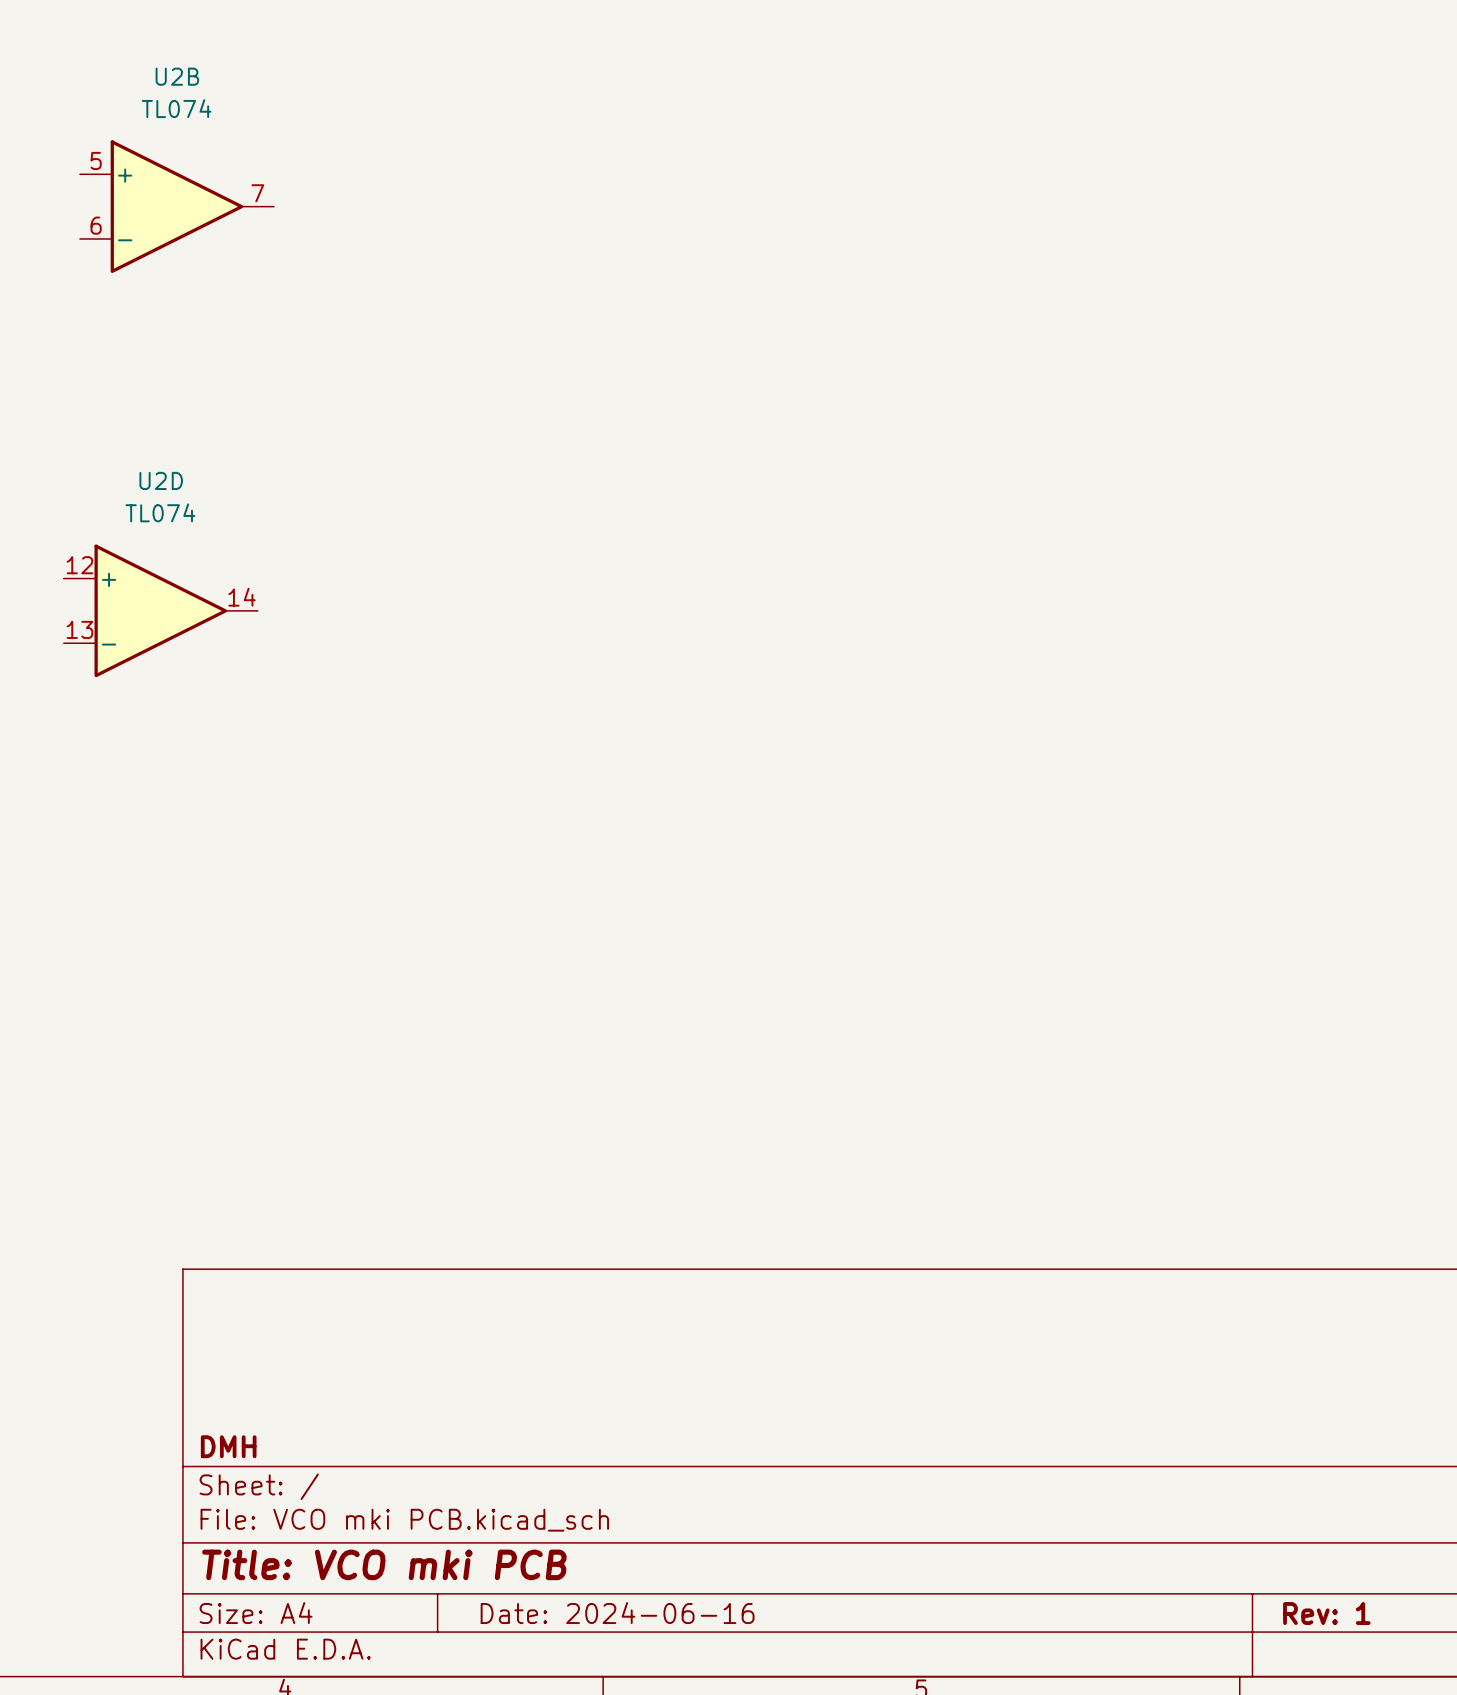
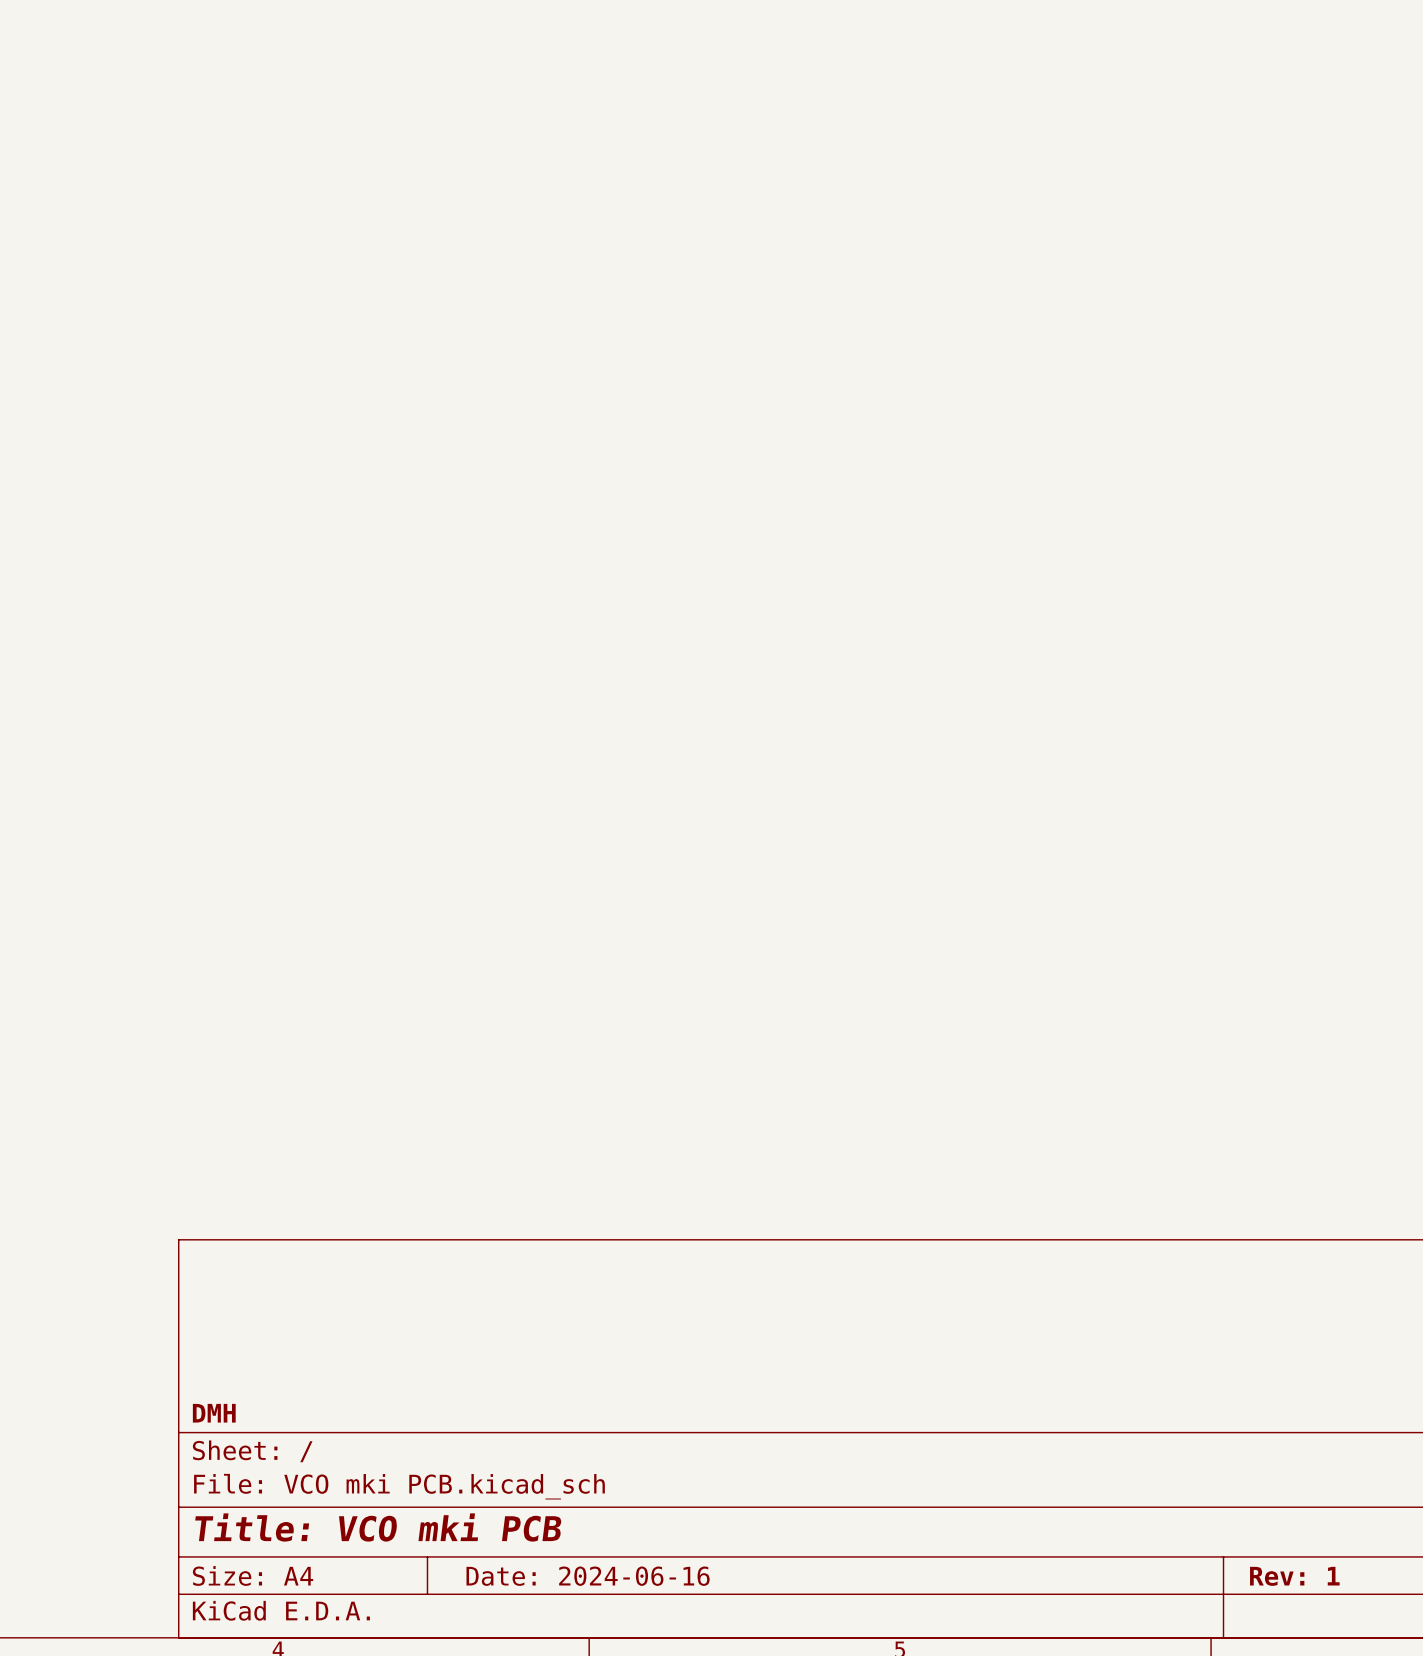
U2B: TL074 (176, 206) -> none
U2D: TL074 (160, 610) -> none

